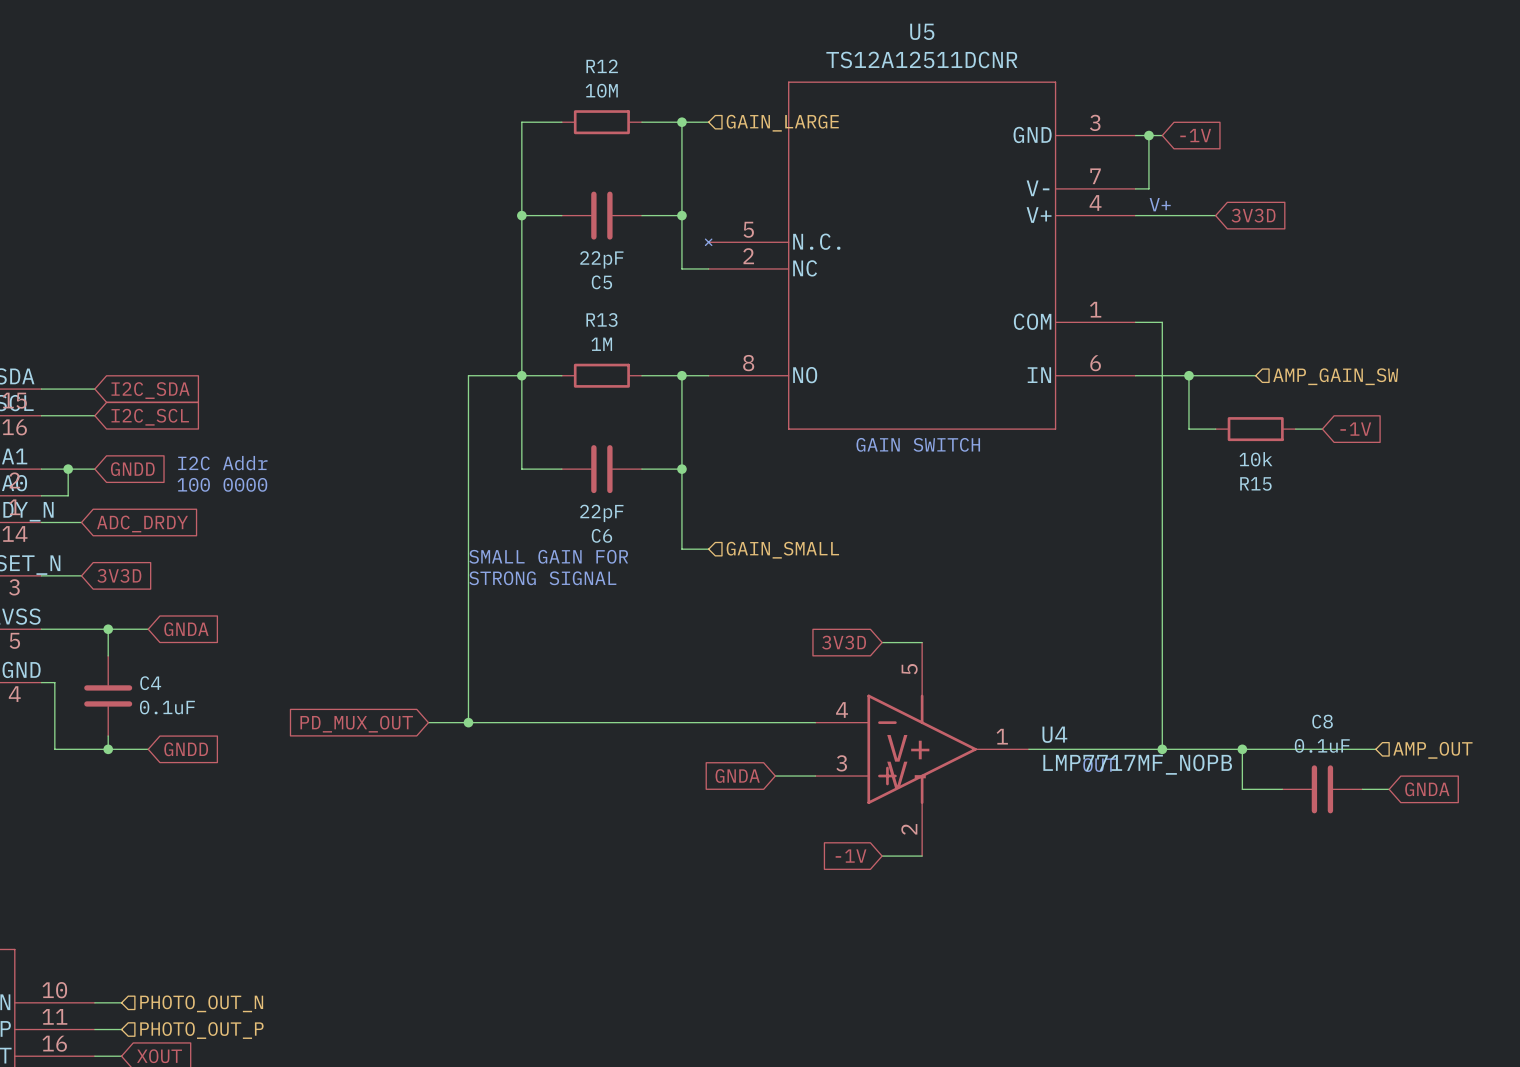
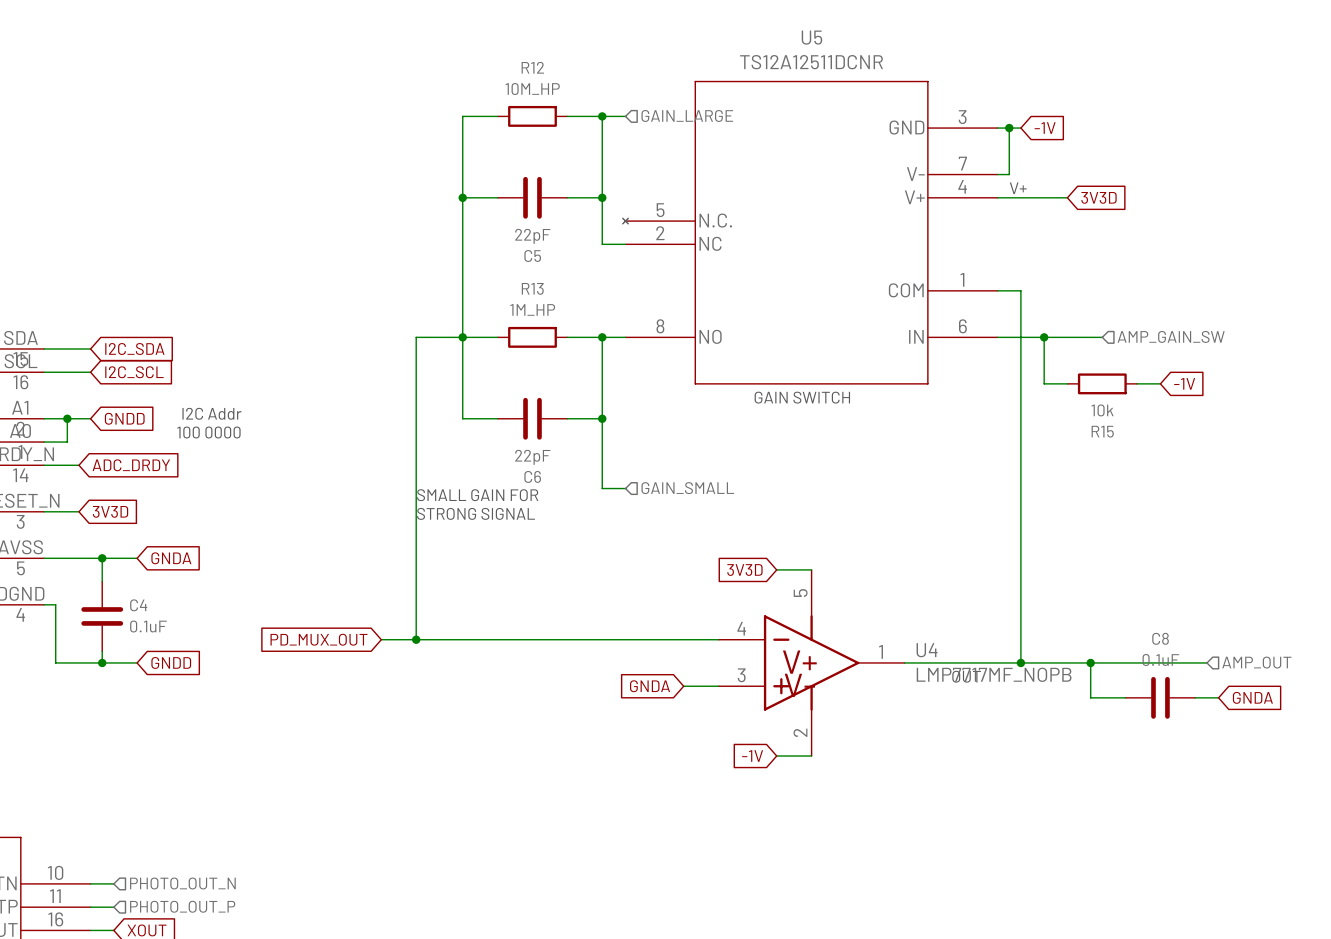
R12 value: 10M (601, 90) -> 10M_HP (532, 89)
R13 value: 1M (601, 344) -> 1M_HP (532, 309)

